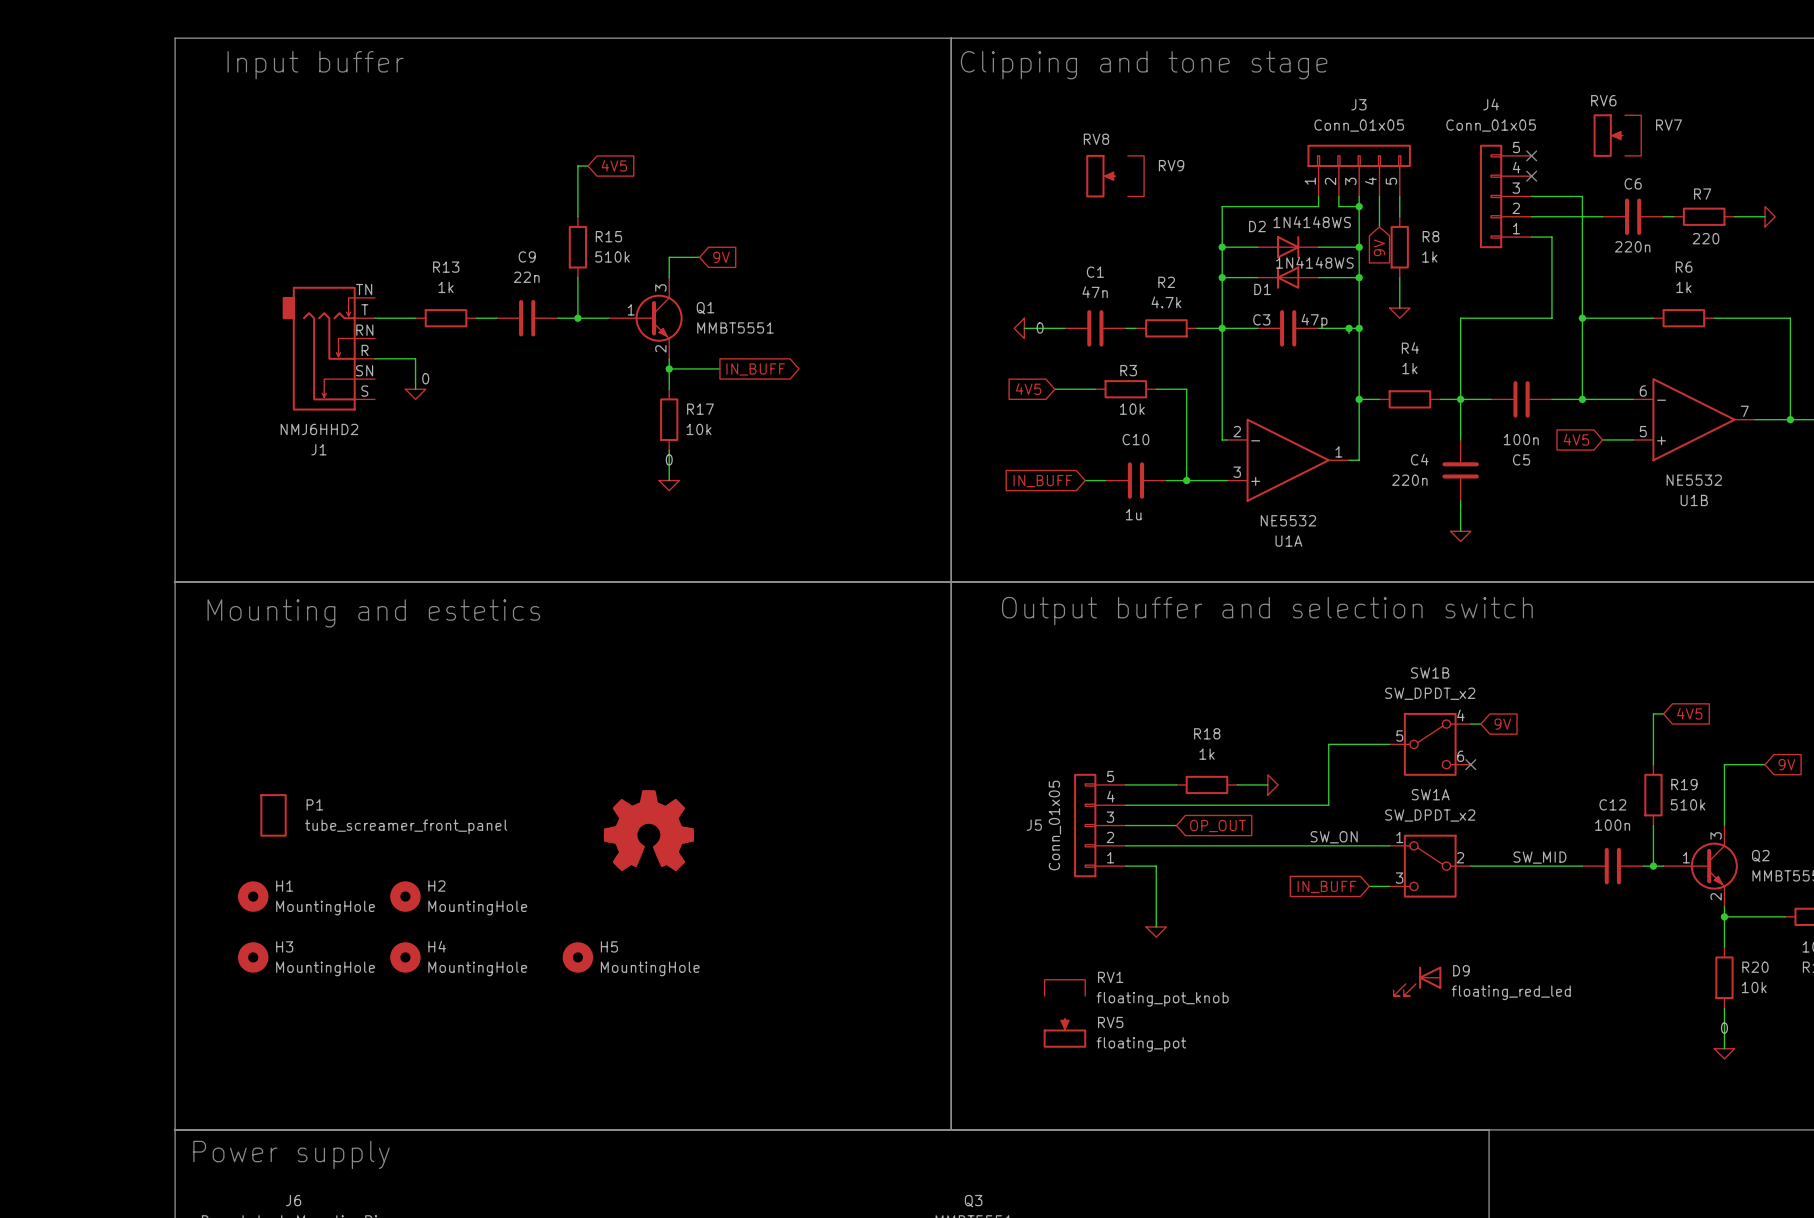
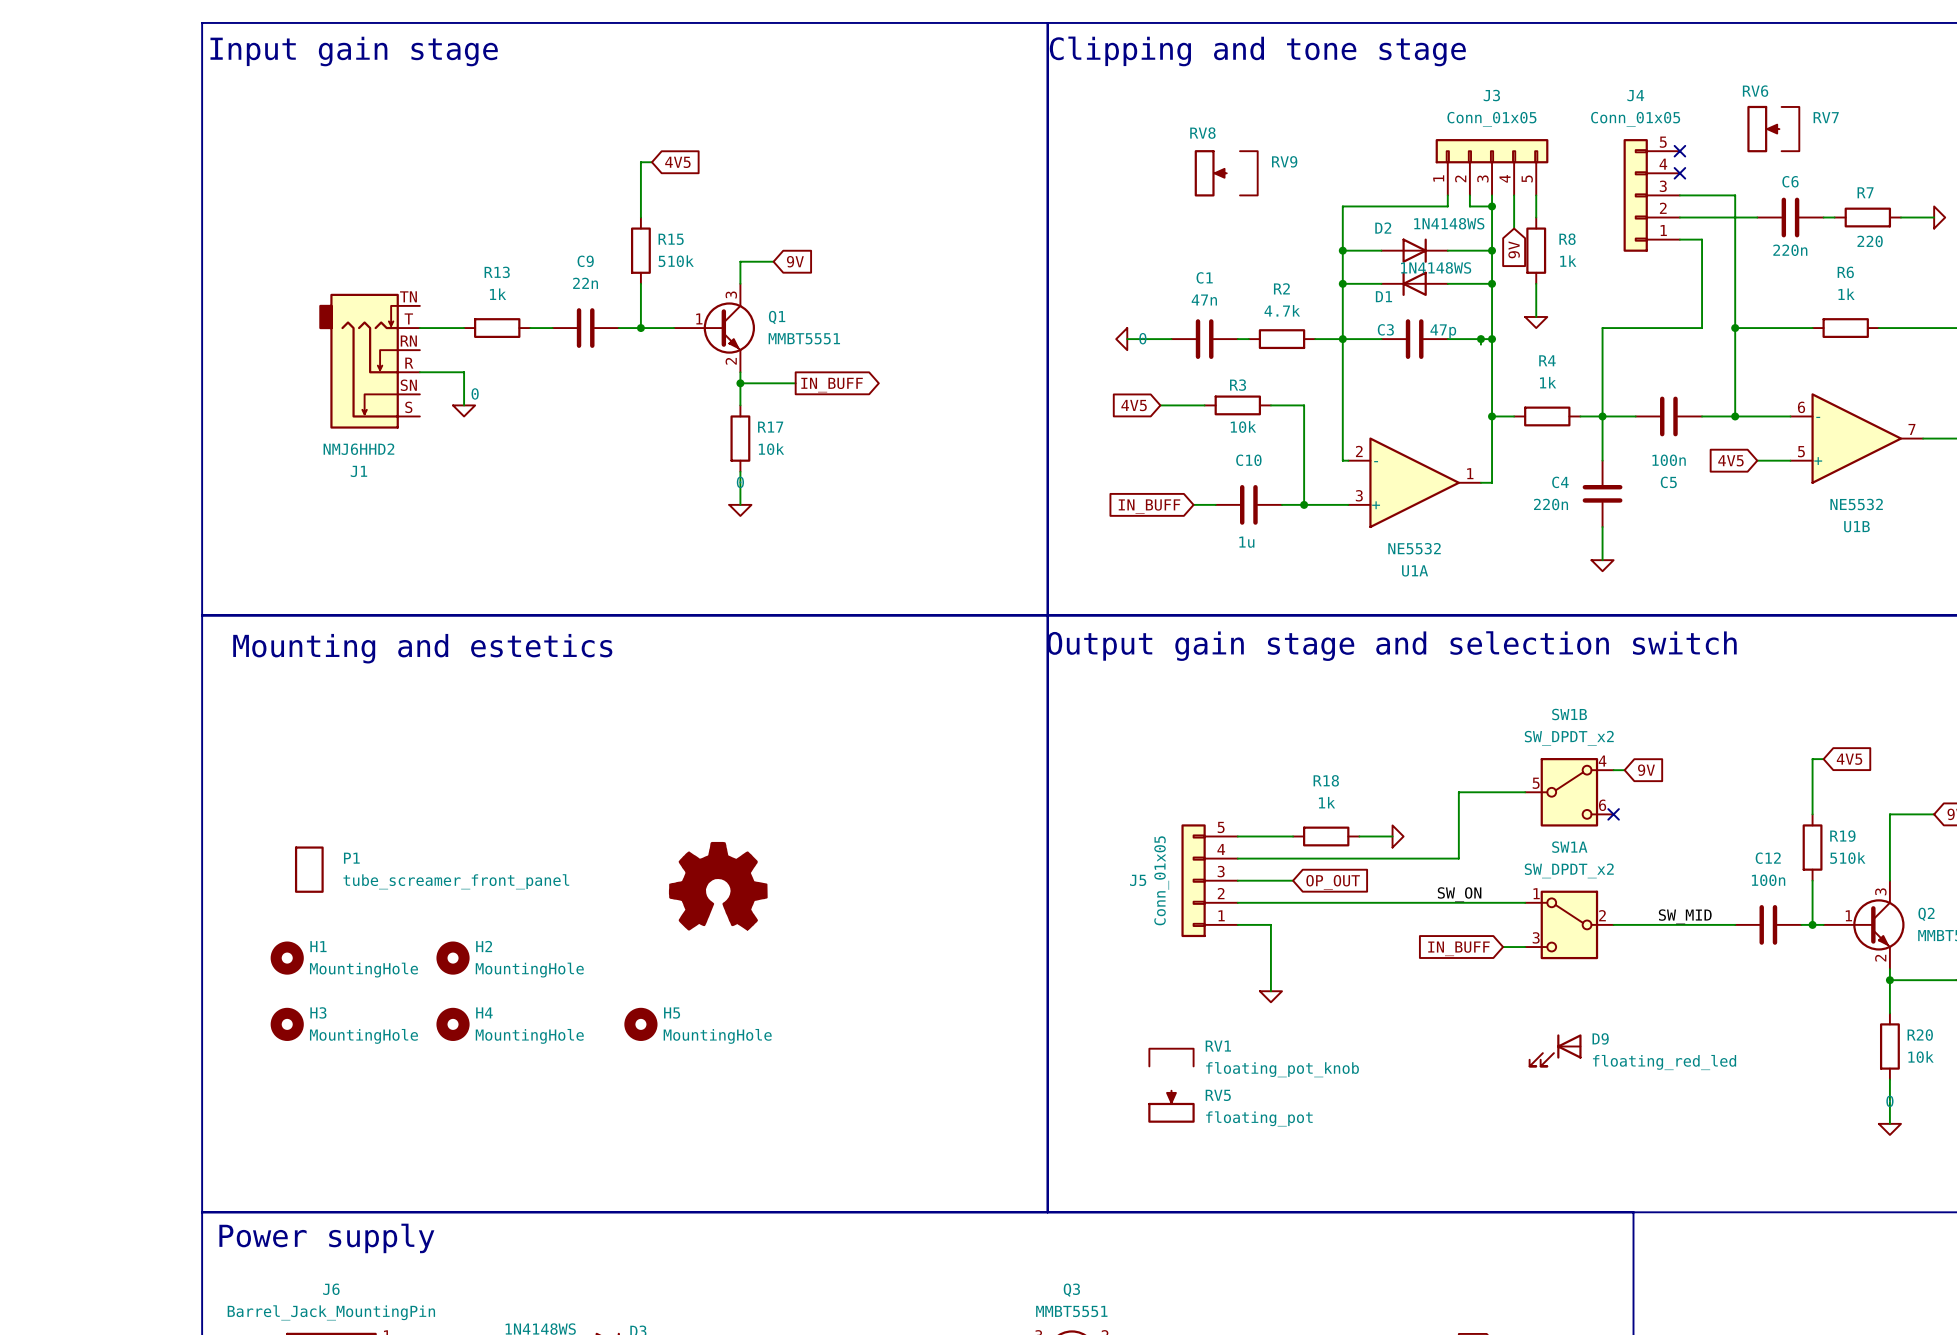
text: Input buffer (315, 65) -> Input gain stage (354, 51)
text: Output buffer and selection switch (1267, 611) -> Output gain stage and selection switch (1392, 646)

